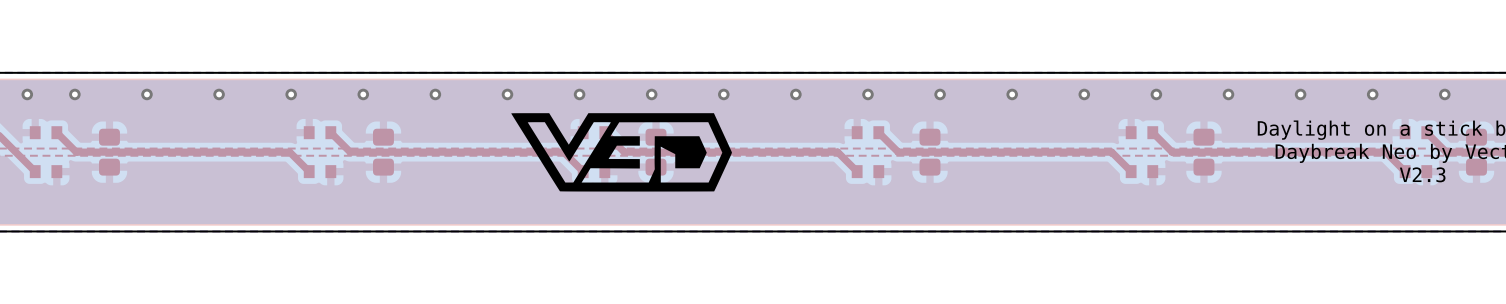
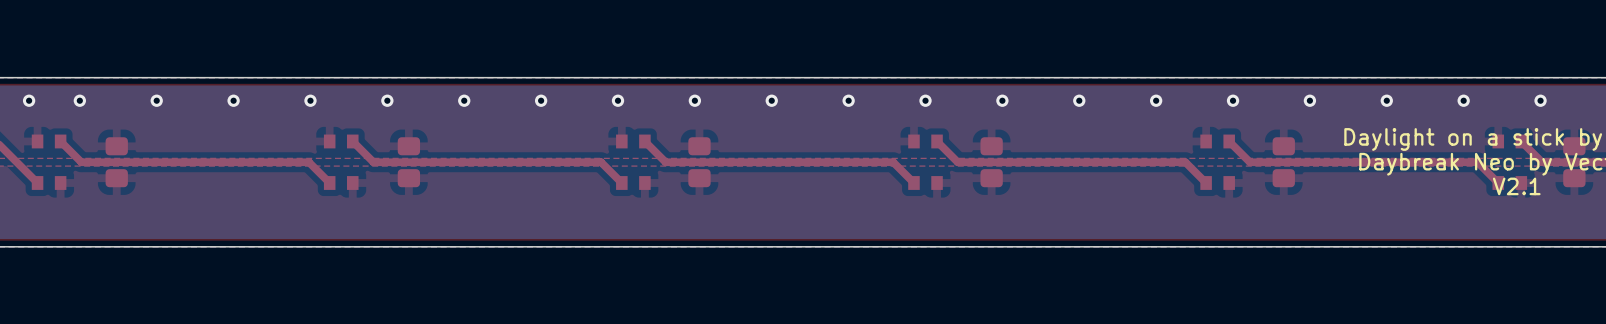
drawing: [511, 113, 732, 192] -> none
text: V2.3 (1422, 174) -> V2.1 (1516, 186)

